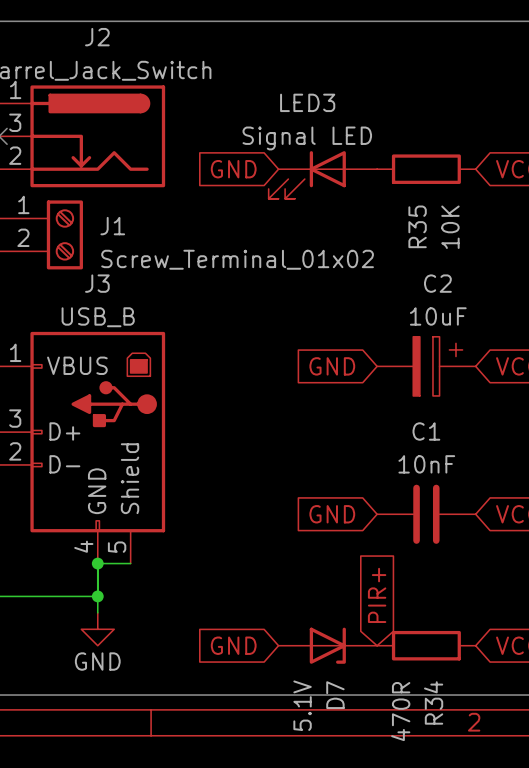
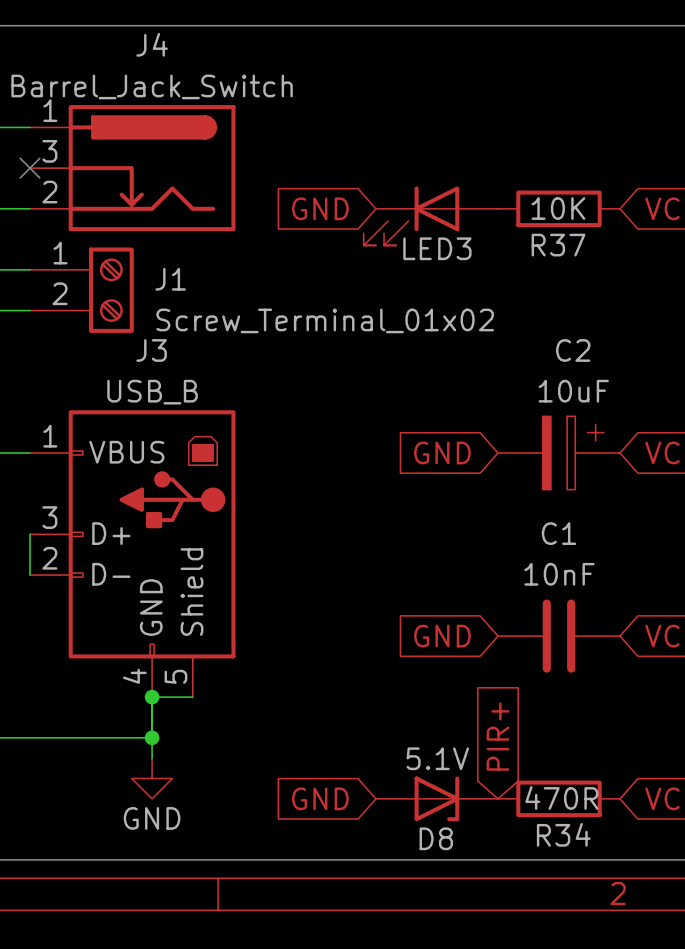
J2 name: J2 (97, 37) -> J4 (152, 44)
LED3 name position: LED3 (307, 102) -> LED3 (437, 248)
LED3 value: Signal LED (307, 138) -> none
R35 name: R35 (417, 226) -> R37 (558, 245)
R35 value rotation: 0° (450, 227) -> 90° clockwise (558, 208)
R35 value position: 10K (450, 227) -> 10K (558, 208)
D7 name: D7 (335, 695) -> D8 (436, 838)
R34 name rotation: 0° (433, 702) -> 90° clockwise (563, 834)
D7 value rotation: 0° (302, 705) -> 90° clockwise (437, 758)
D7 value position: 5.1V (302, 705) -> 5.1V (437, 758)
R34 value rotation: 0° (400, 711) -> 90° clockwise (561, 797)
R34 value position: 470R (400, 711) -> 470R (561, 797)

